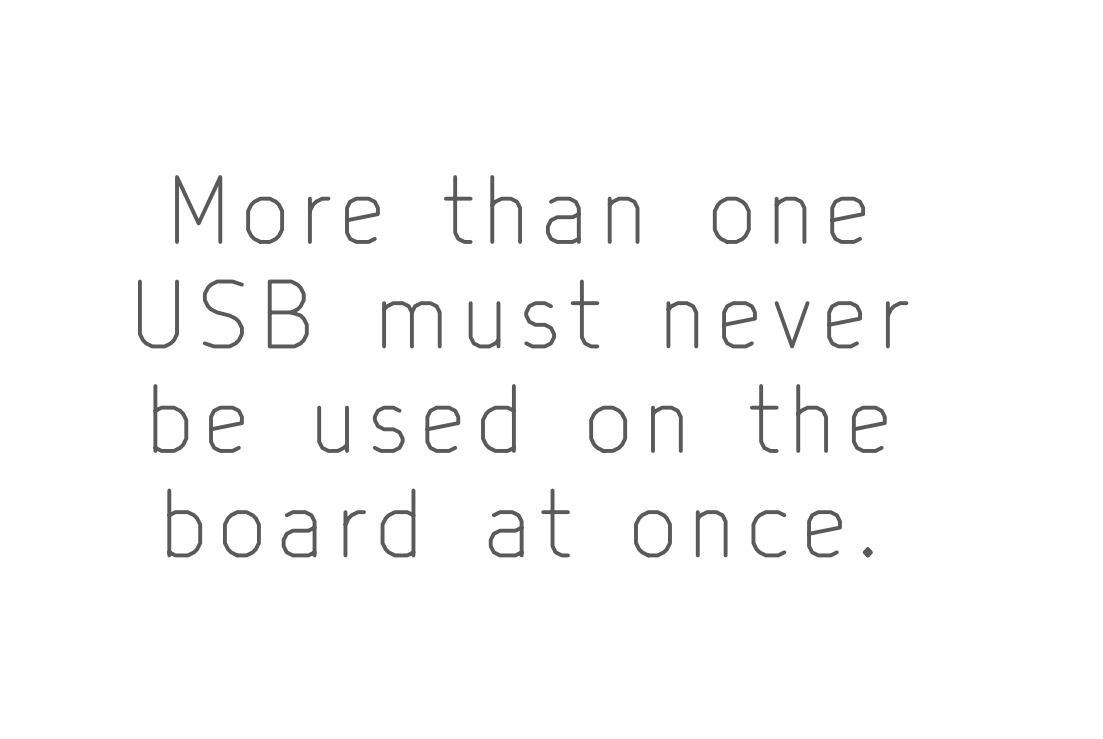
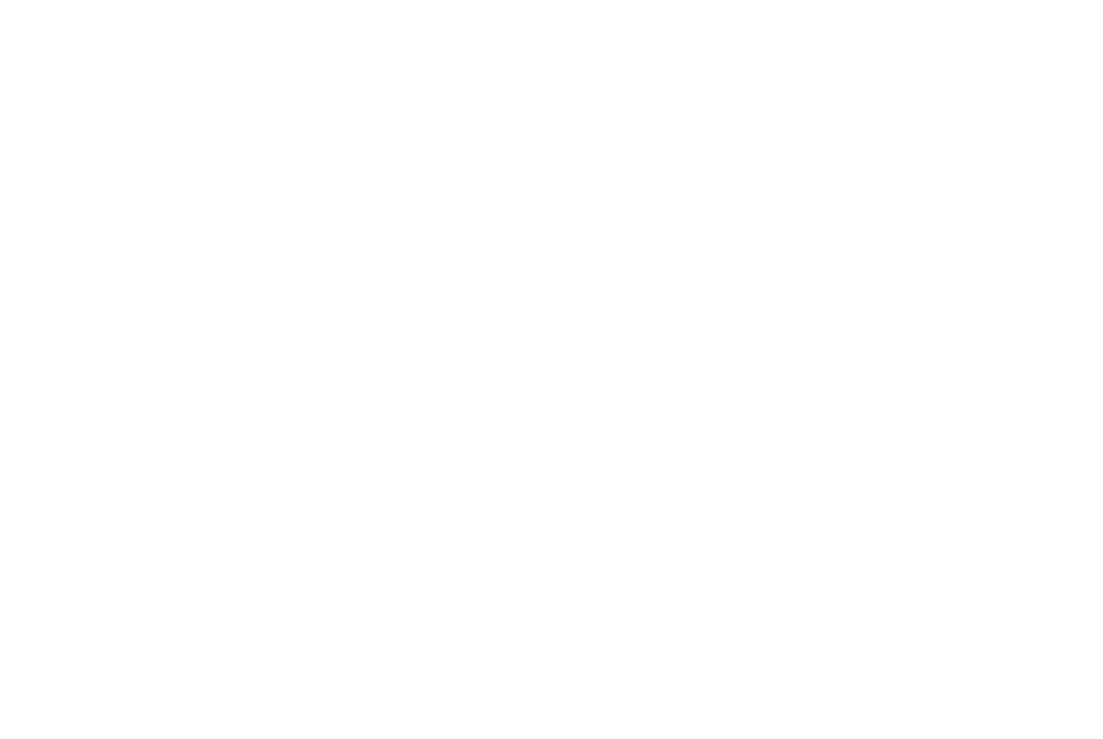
text: More than one (520, 209) -> none
text: USB must never (523, 313) -> none
text: be used on the (520, 418) -> none
text: board at once. (520, 522) -> none

